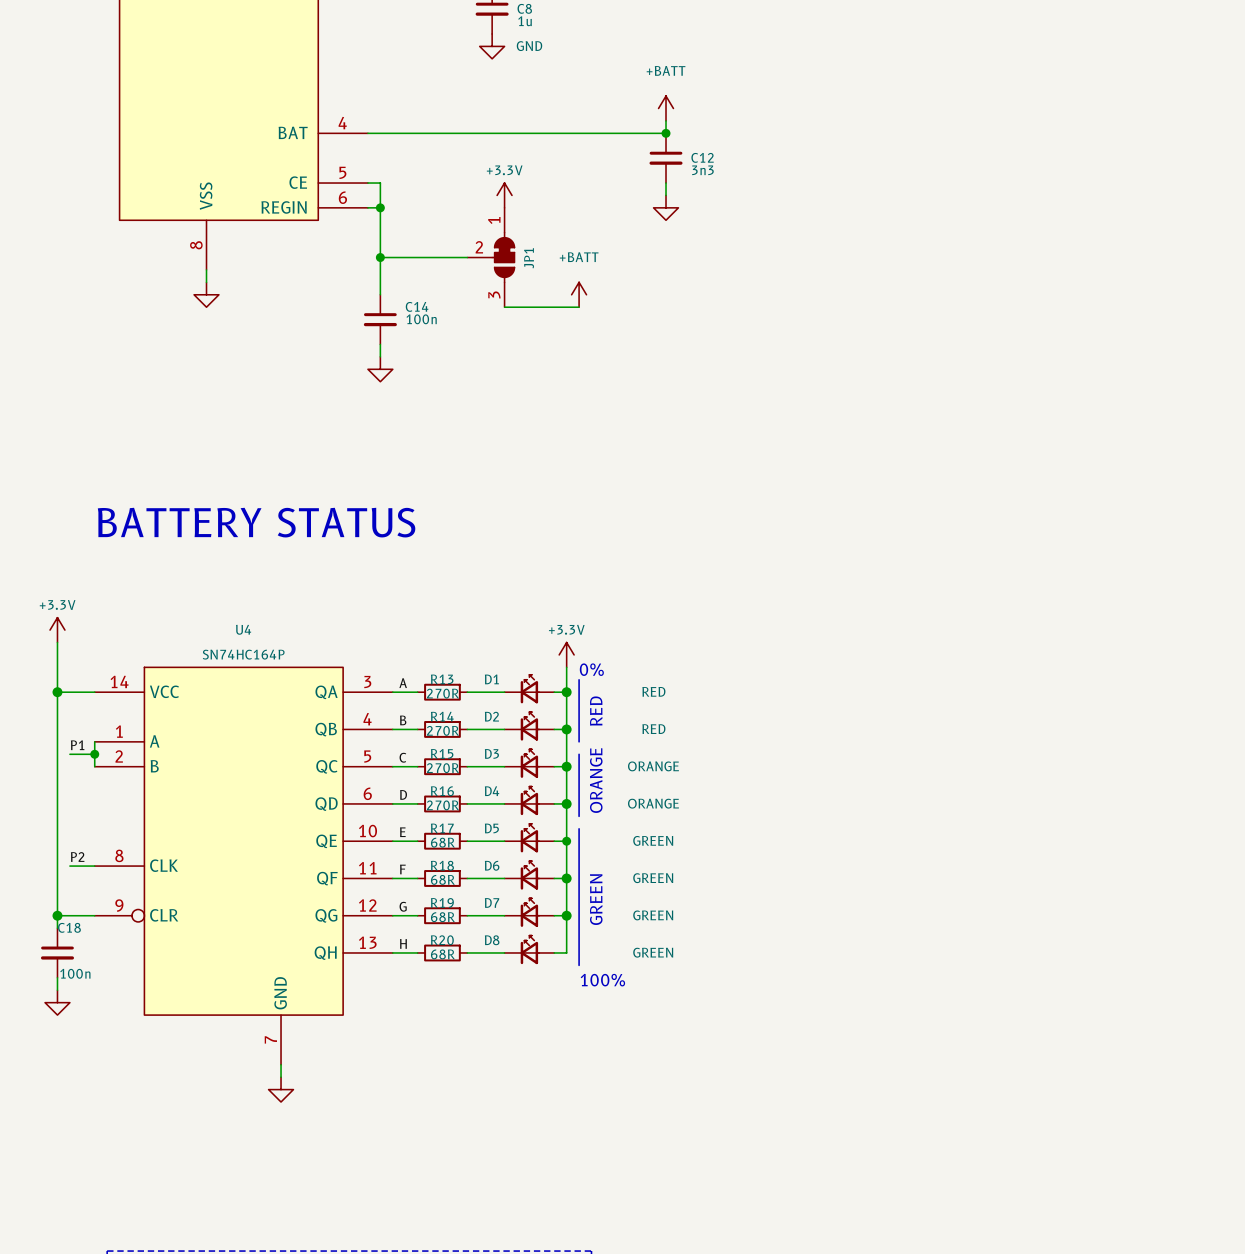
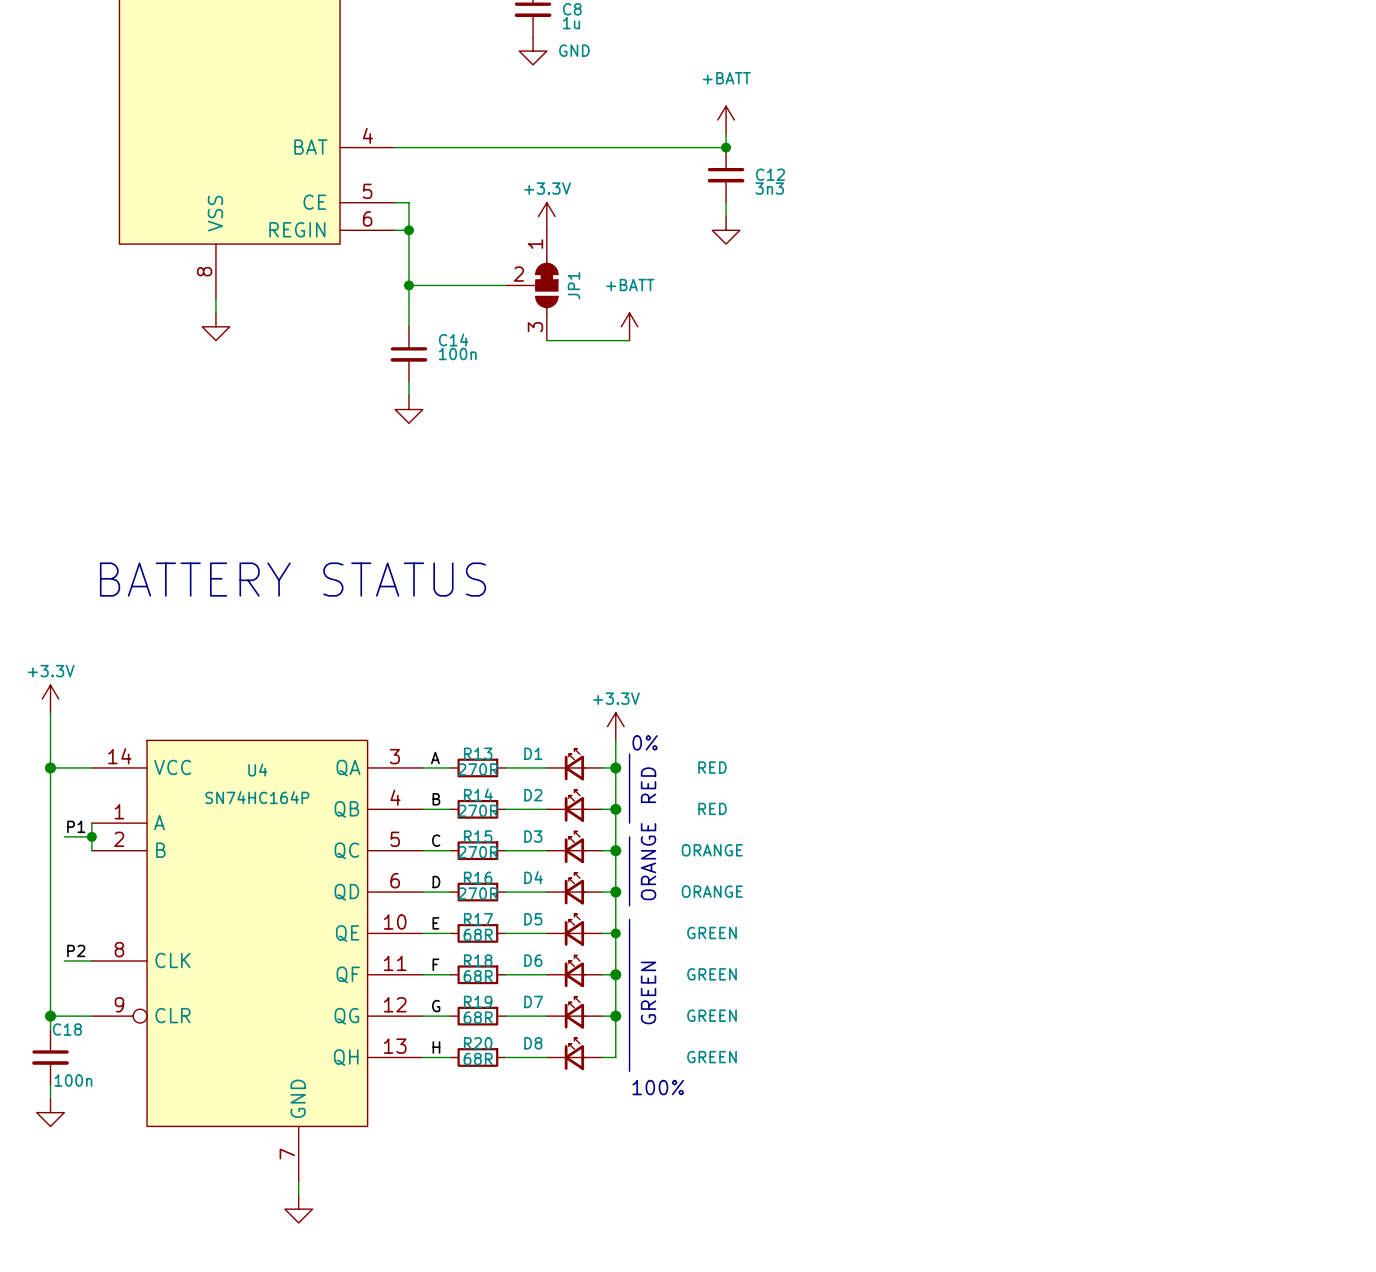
U4 name position: U4 (243, 629) -> U4 (257, 770)
U4 value position: SN74HC164P (243, 654) -> SN74HC164P (257, 797)

